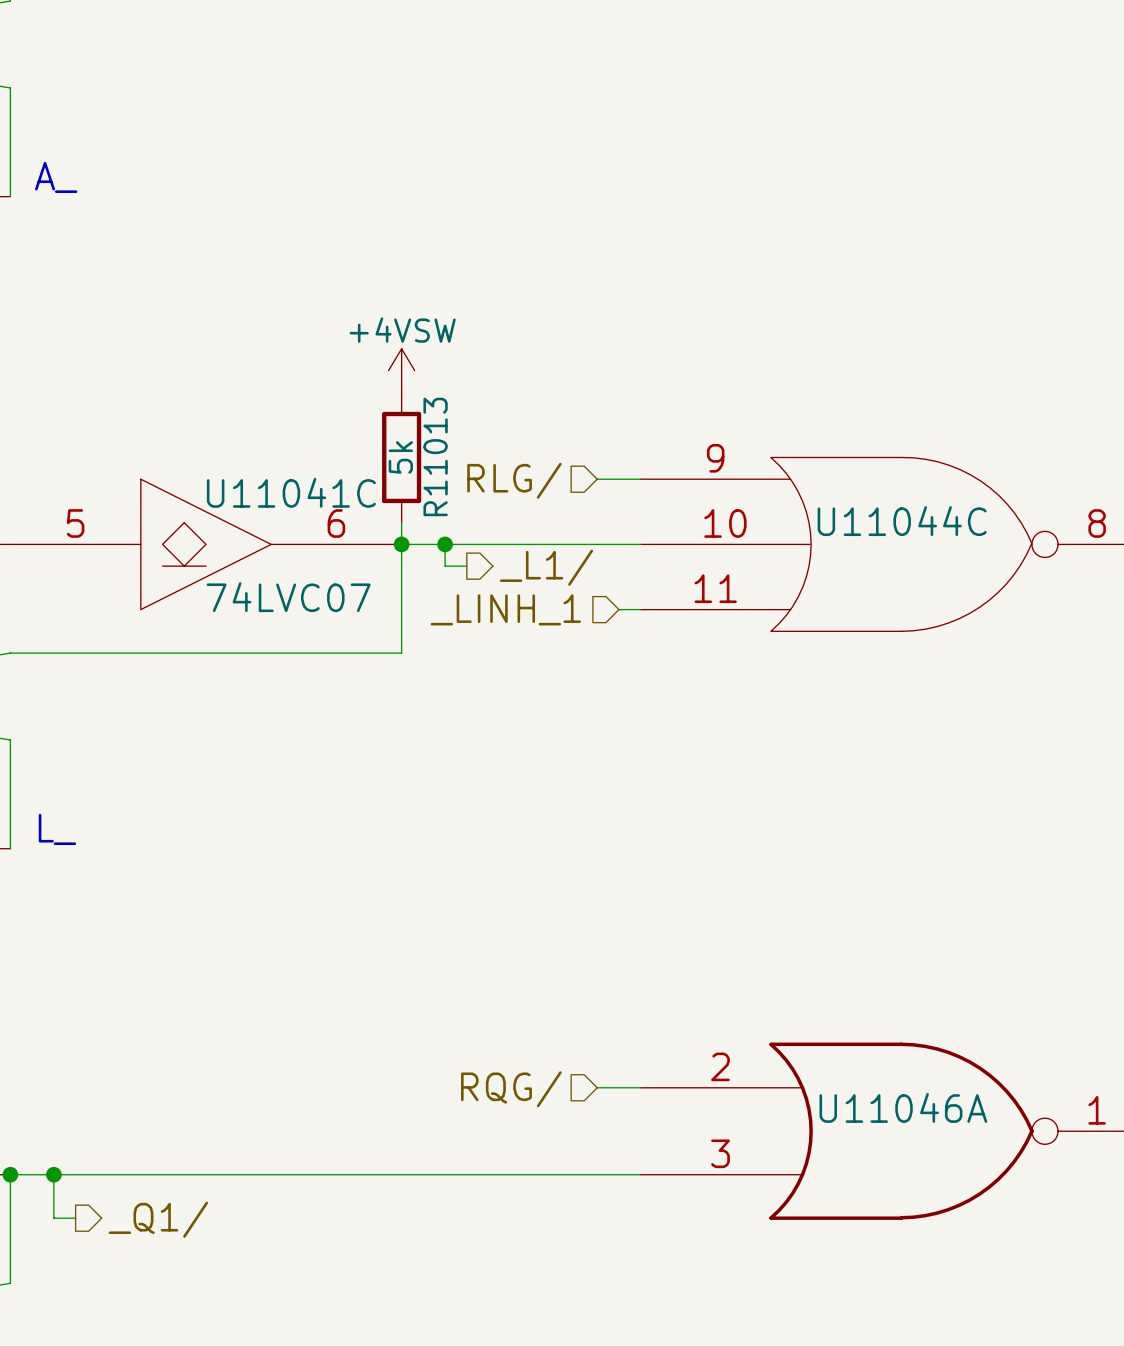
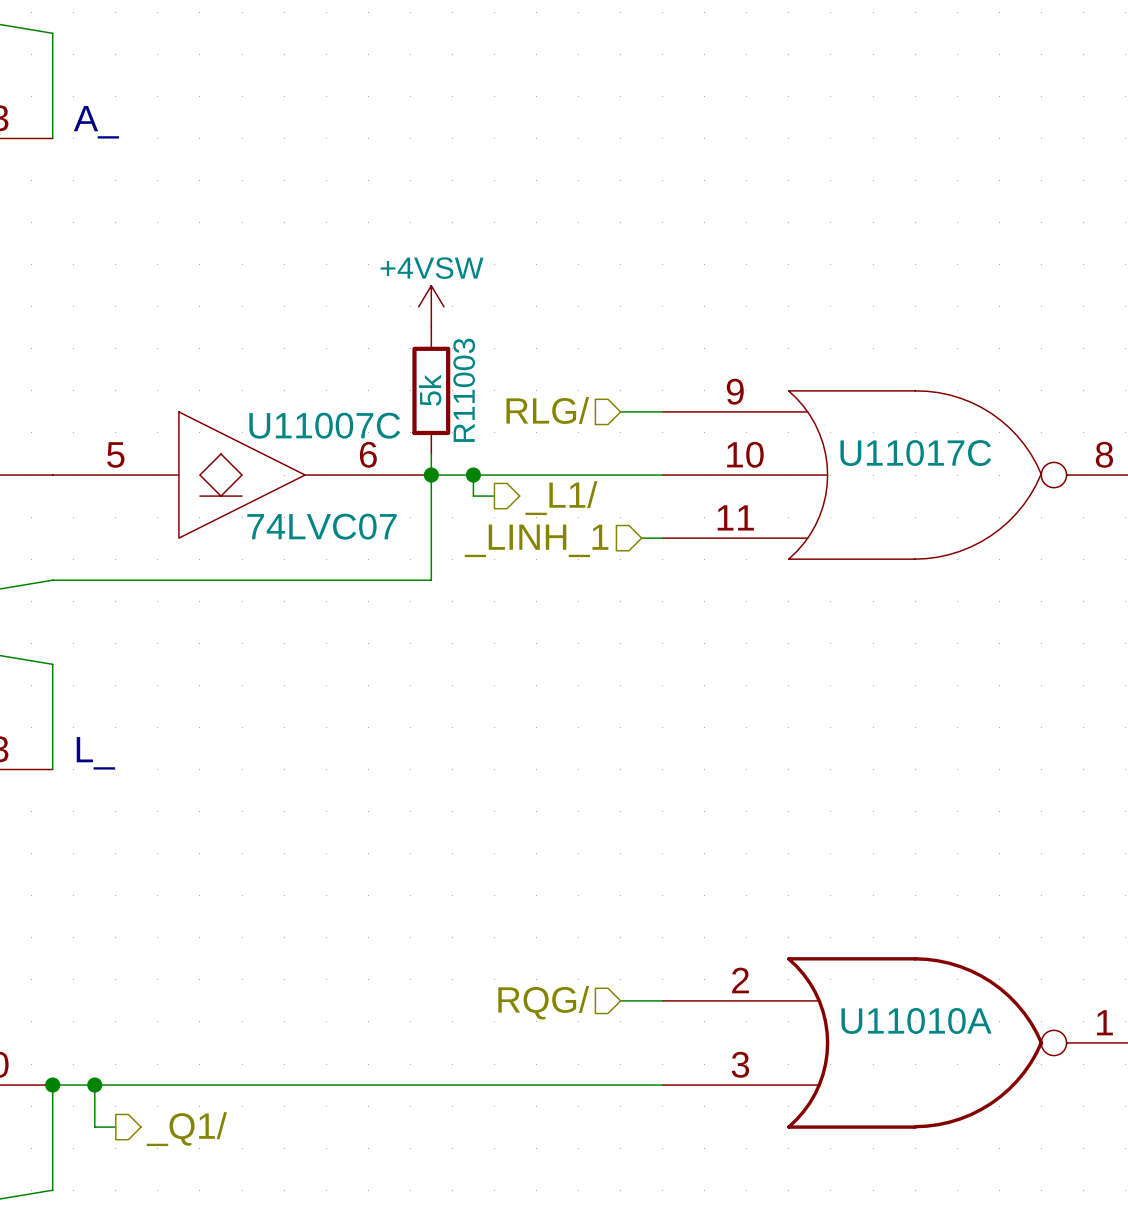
R11013 name: R11013 (435, 456) -> R11003 (464, 390)
U11041C name: U11041C (291, 492) -> U11007C (324, 425)
U11044C name: U11044C (902, 521) -> U11017C (915, 453)
U11046A name: U11046A (903, 1107) -> U11010A (916, 1020)

